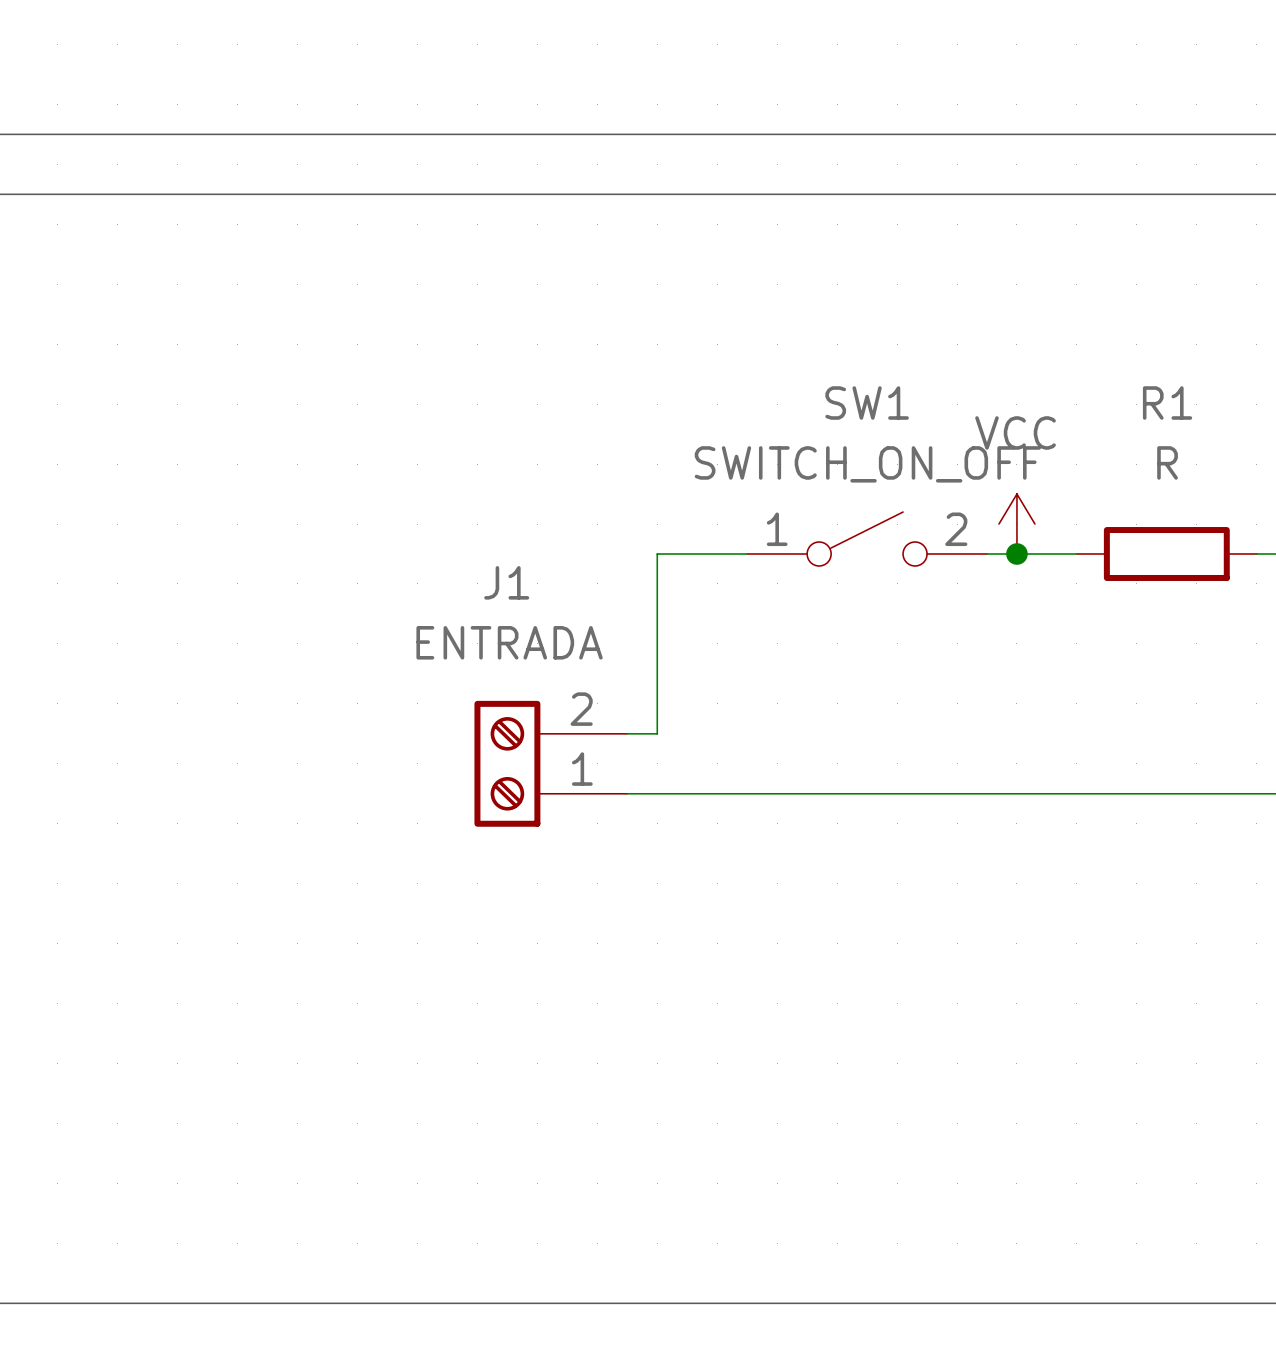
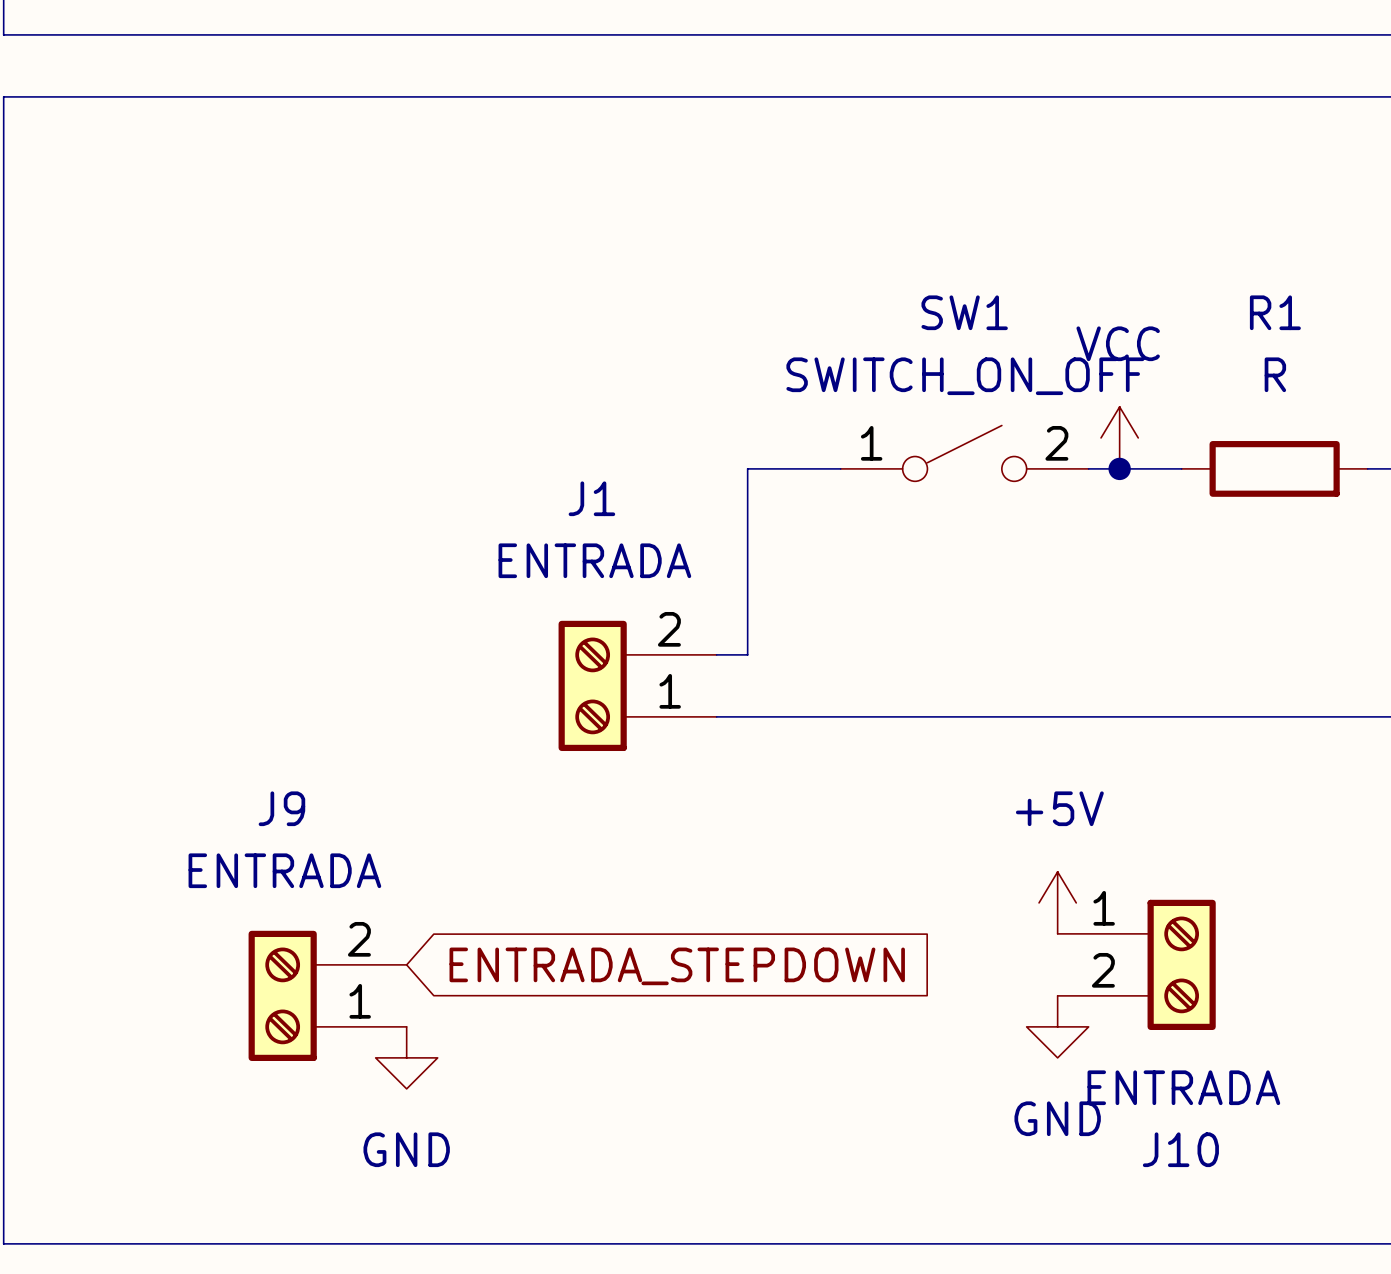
power symbol: none -> +5V (1057, 902)
J10: none -> ENTRADA (1136, 964)
global label: none -> ENTRADA_STEPDOWN (677, 966)
J9: none -> ENTRADA (327, 995)
power symbol: none -> GND (1057, 1026)
power symbol: none -> GND (406, 1057)

